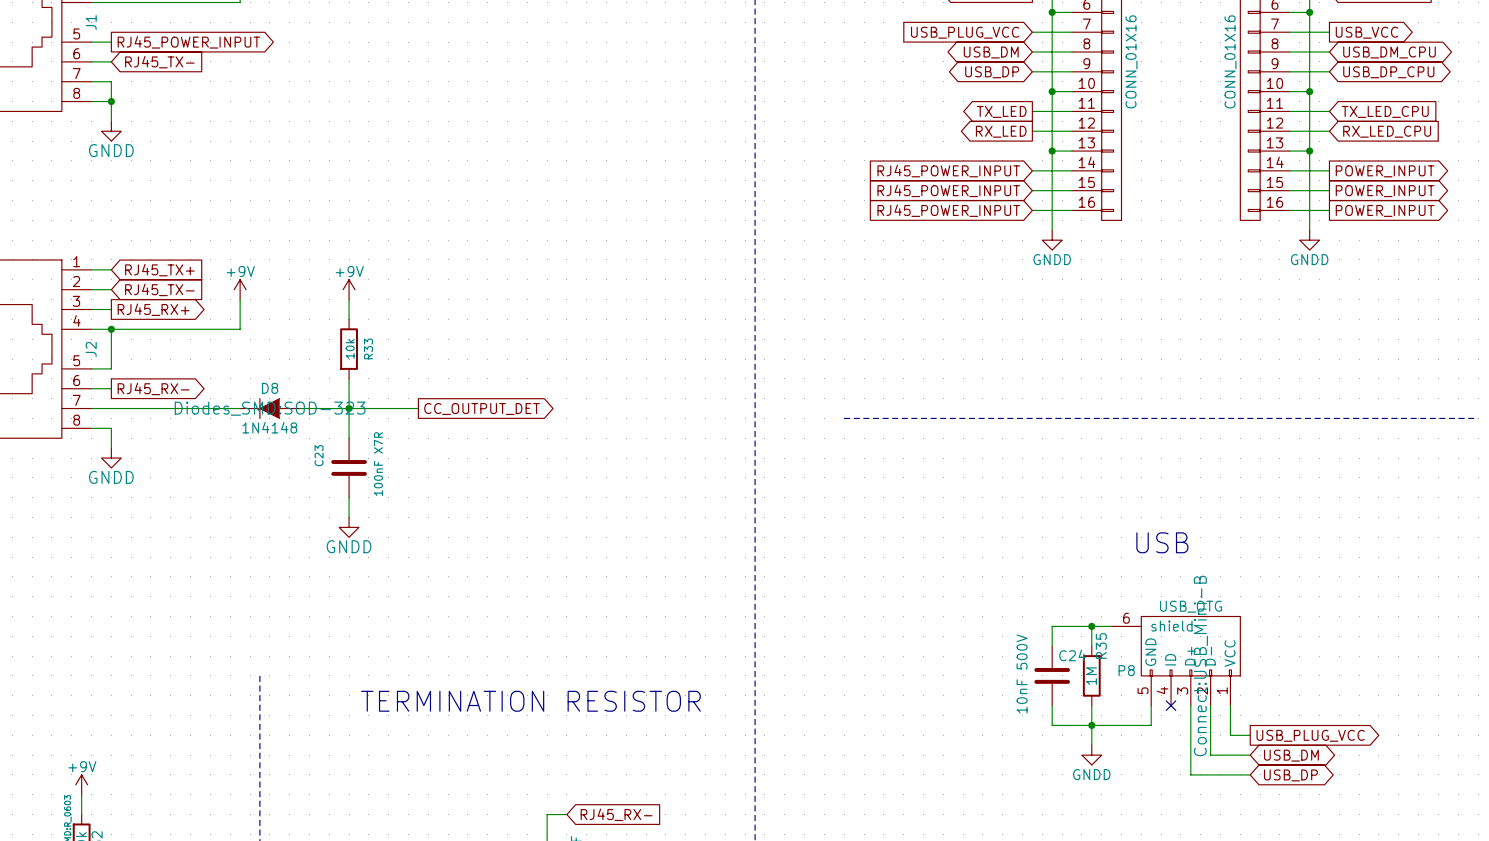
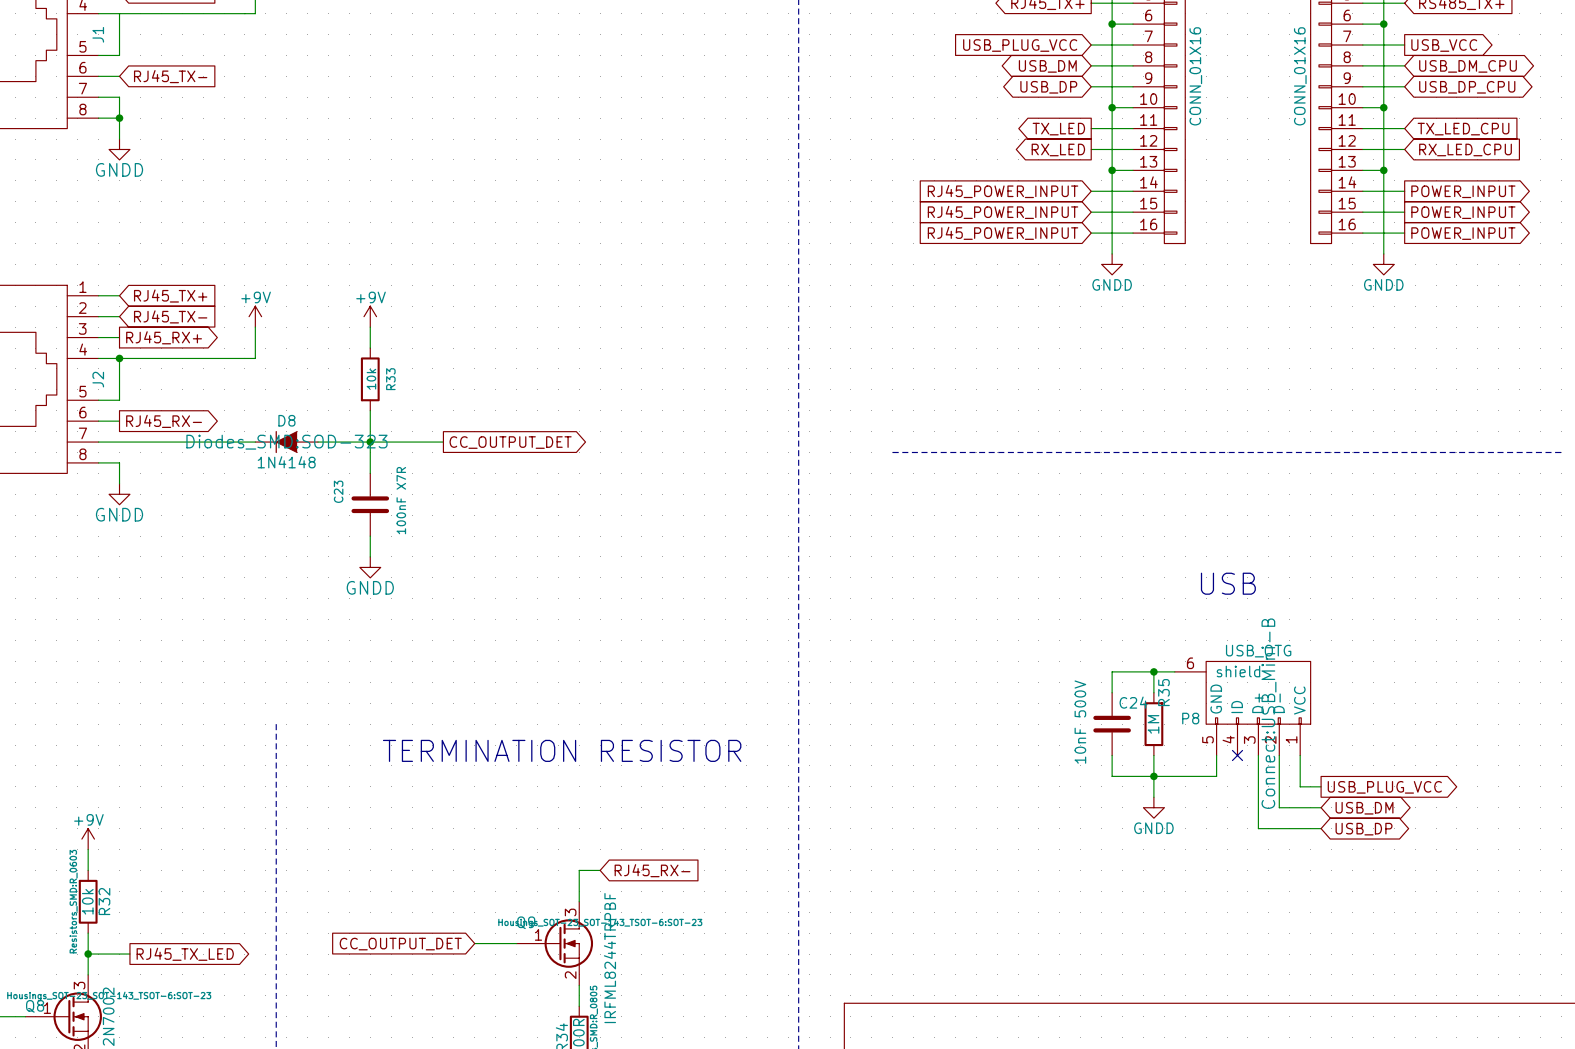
wire: none -> (119, 13) (119, 55)
global label: RJ45_POWER_INPUT (188, 42) -> none

